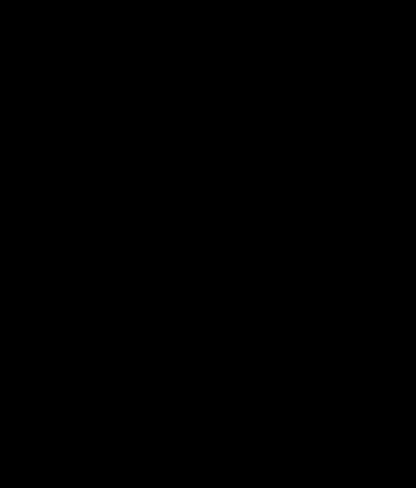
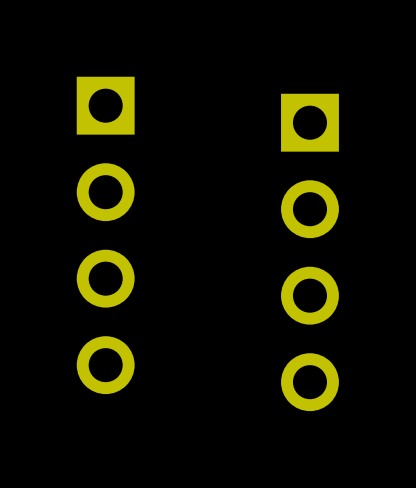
part: none -> (105, 235)
part: none -> (309, 252)

